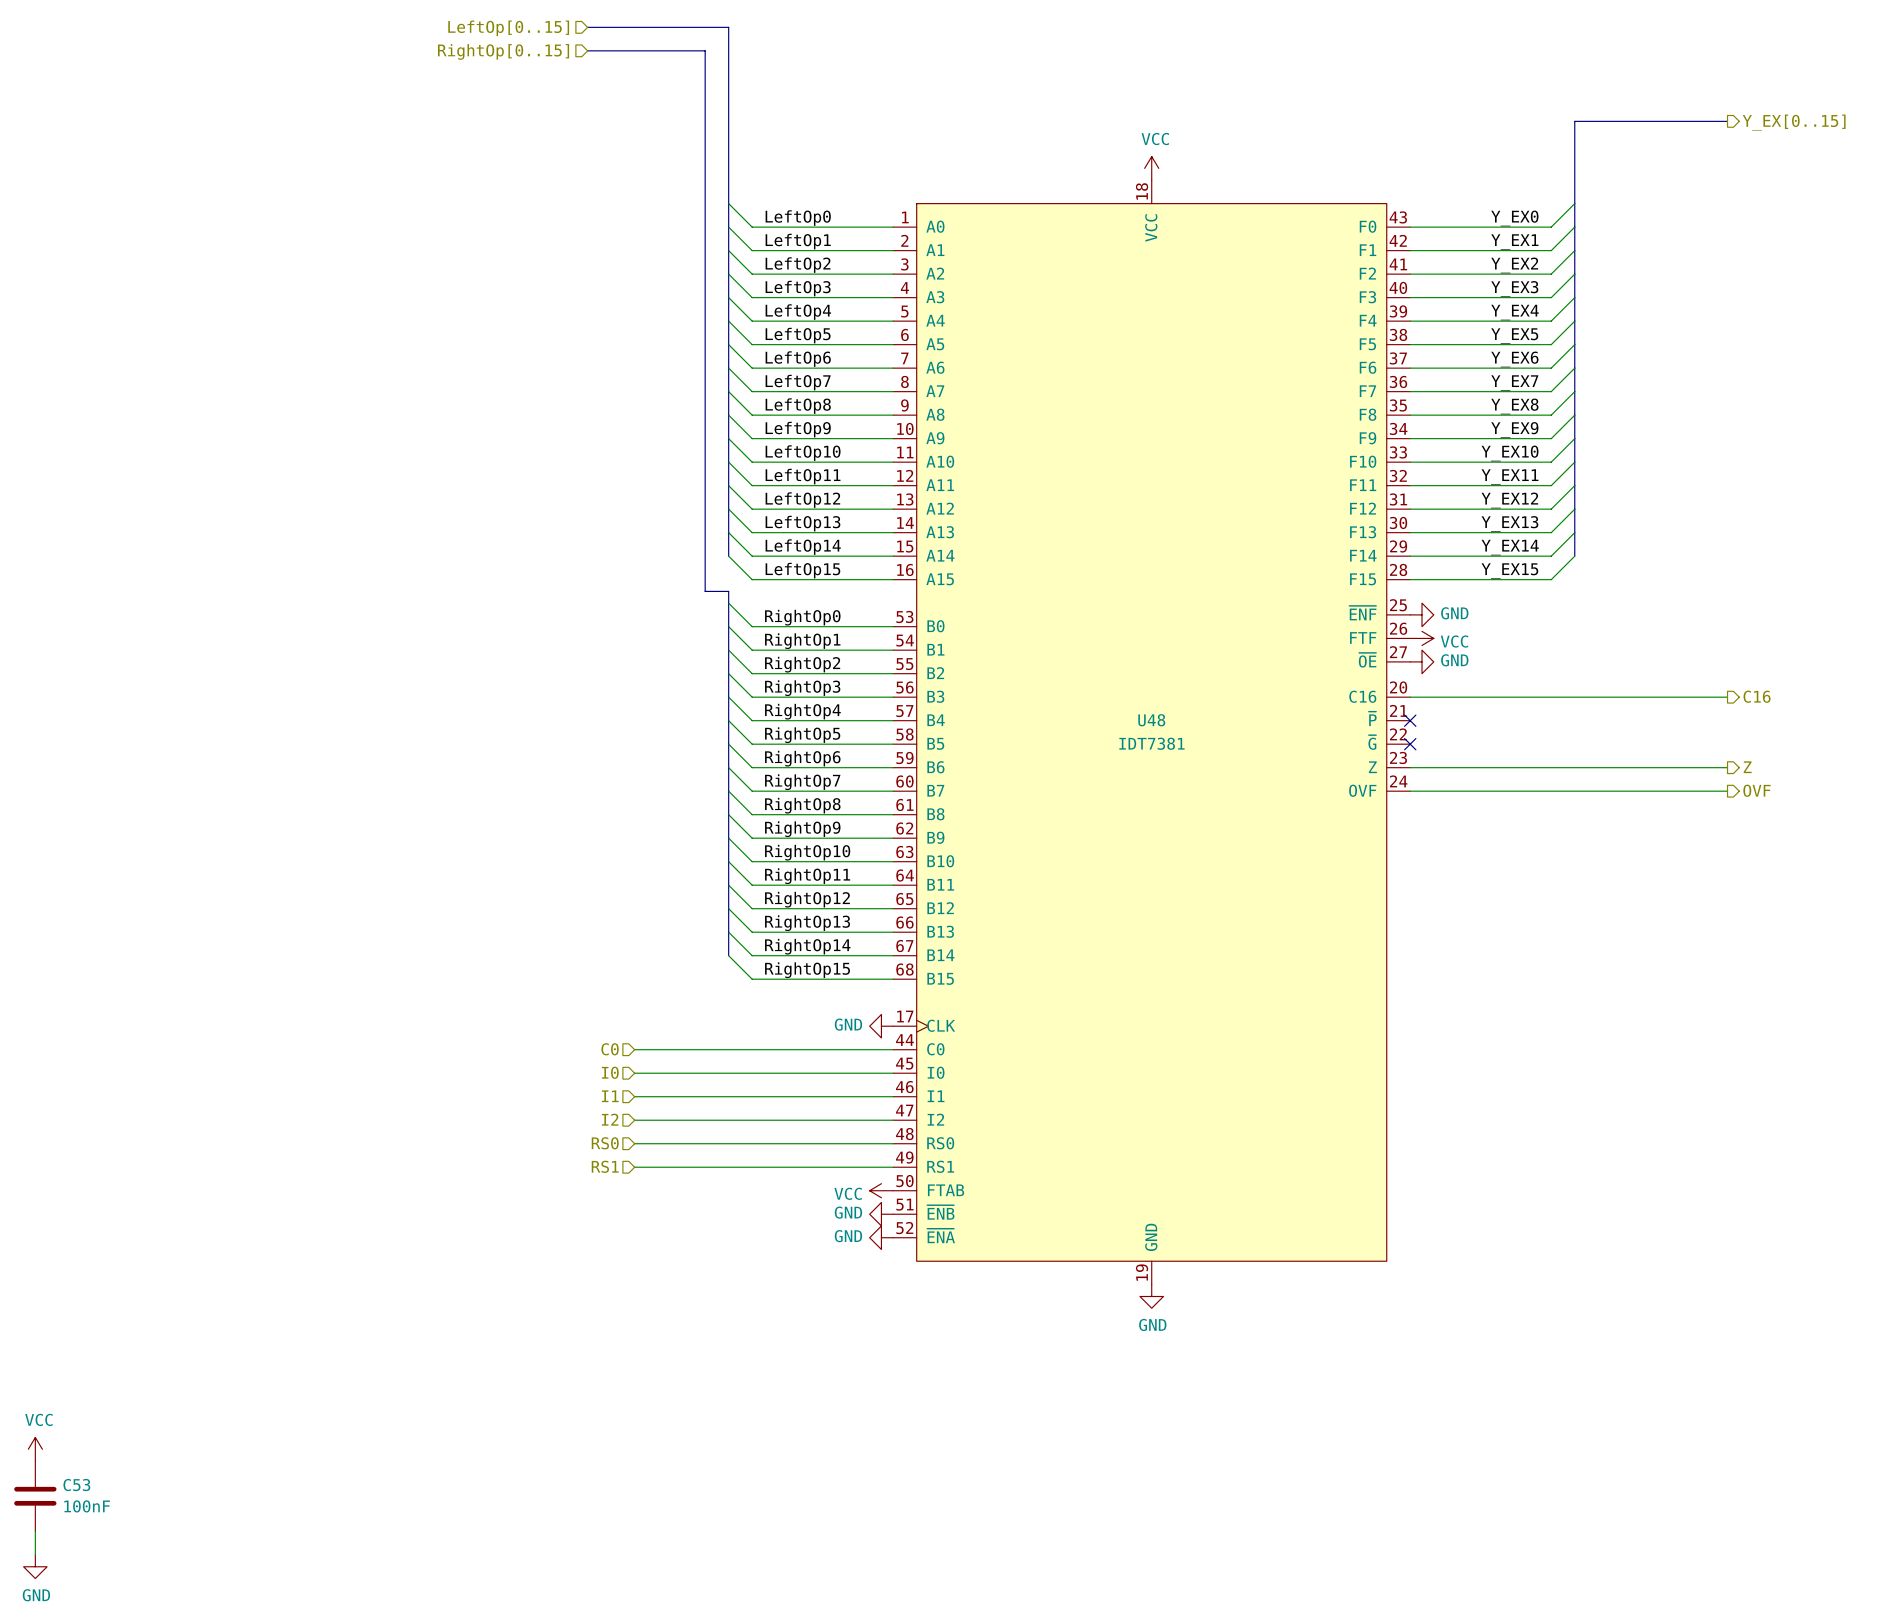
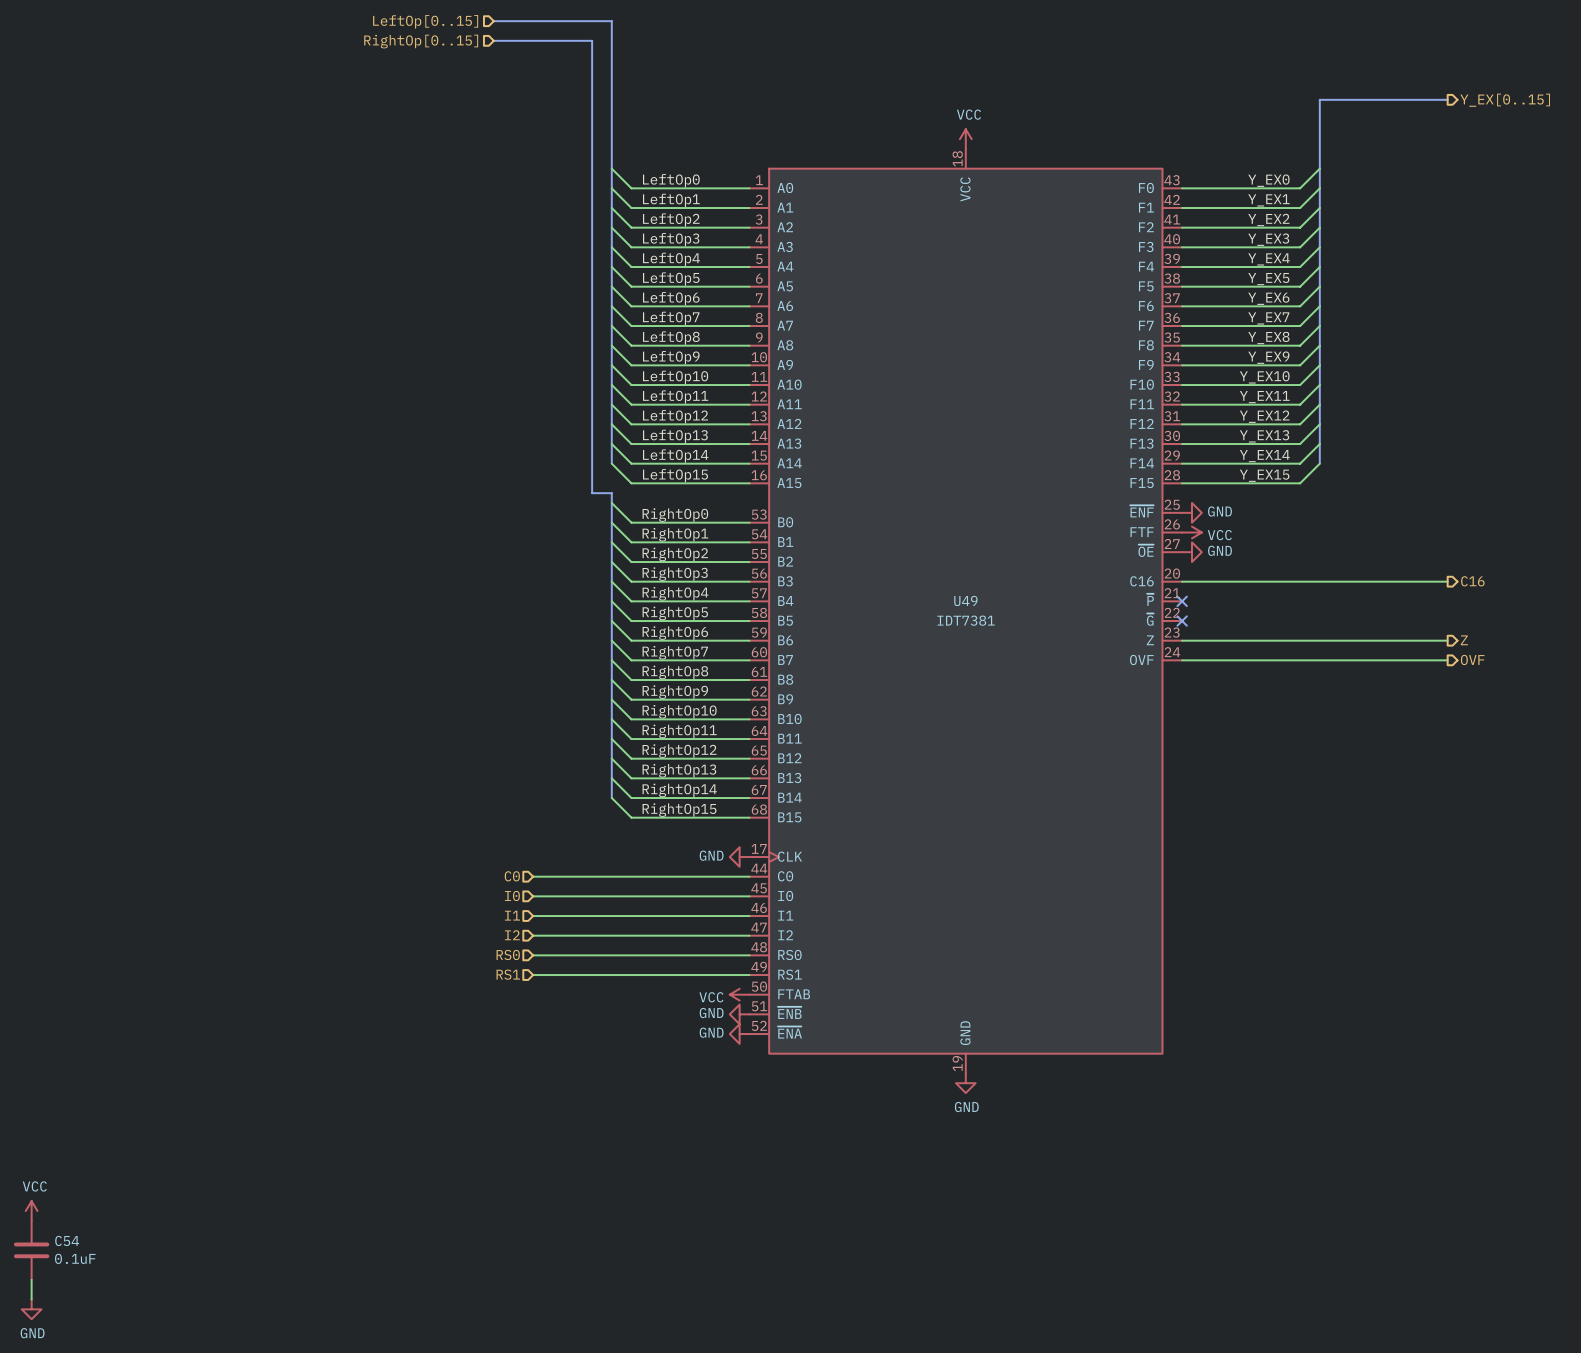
U48 name: U48 (1151, 720) -> U49 (965, 600)
C53 name: C53 (76, 1485) -> C54 (67, 1240)
C53 value: 100nF (87, 1506) -> 0.1uF (75, 1258)

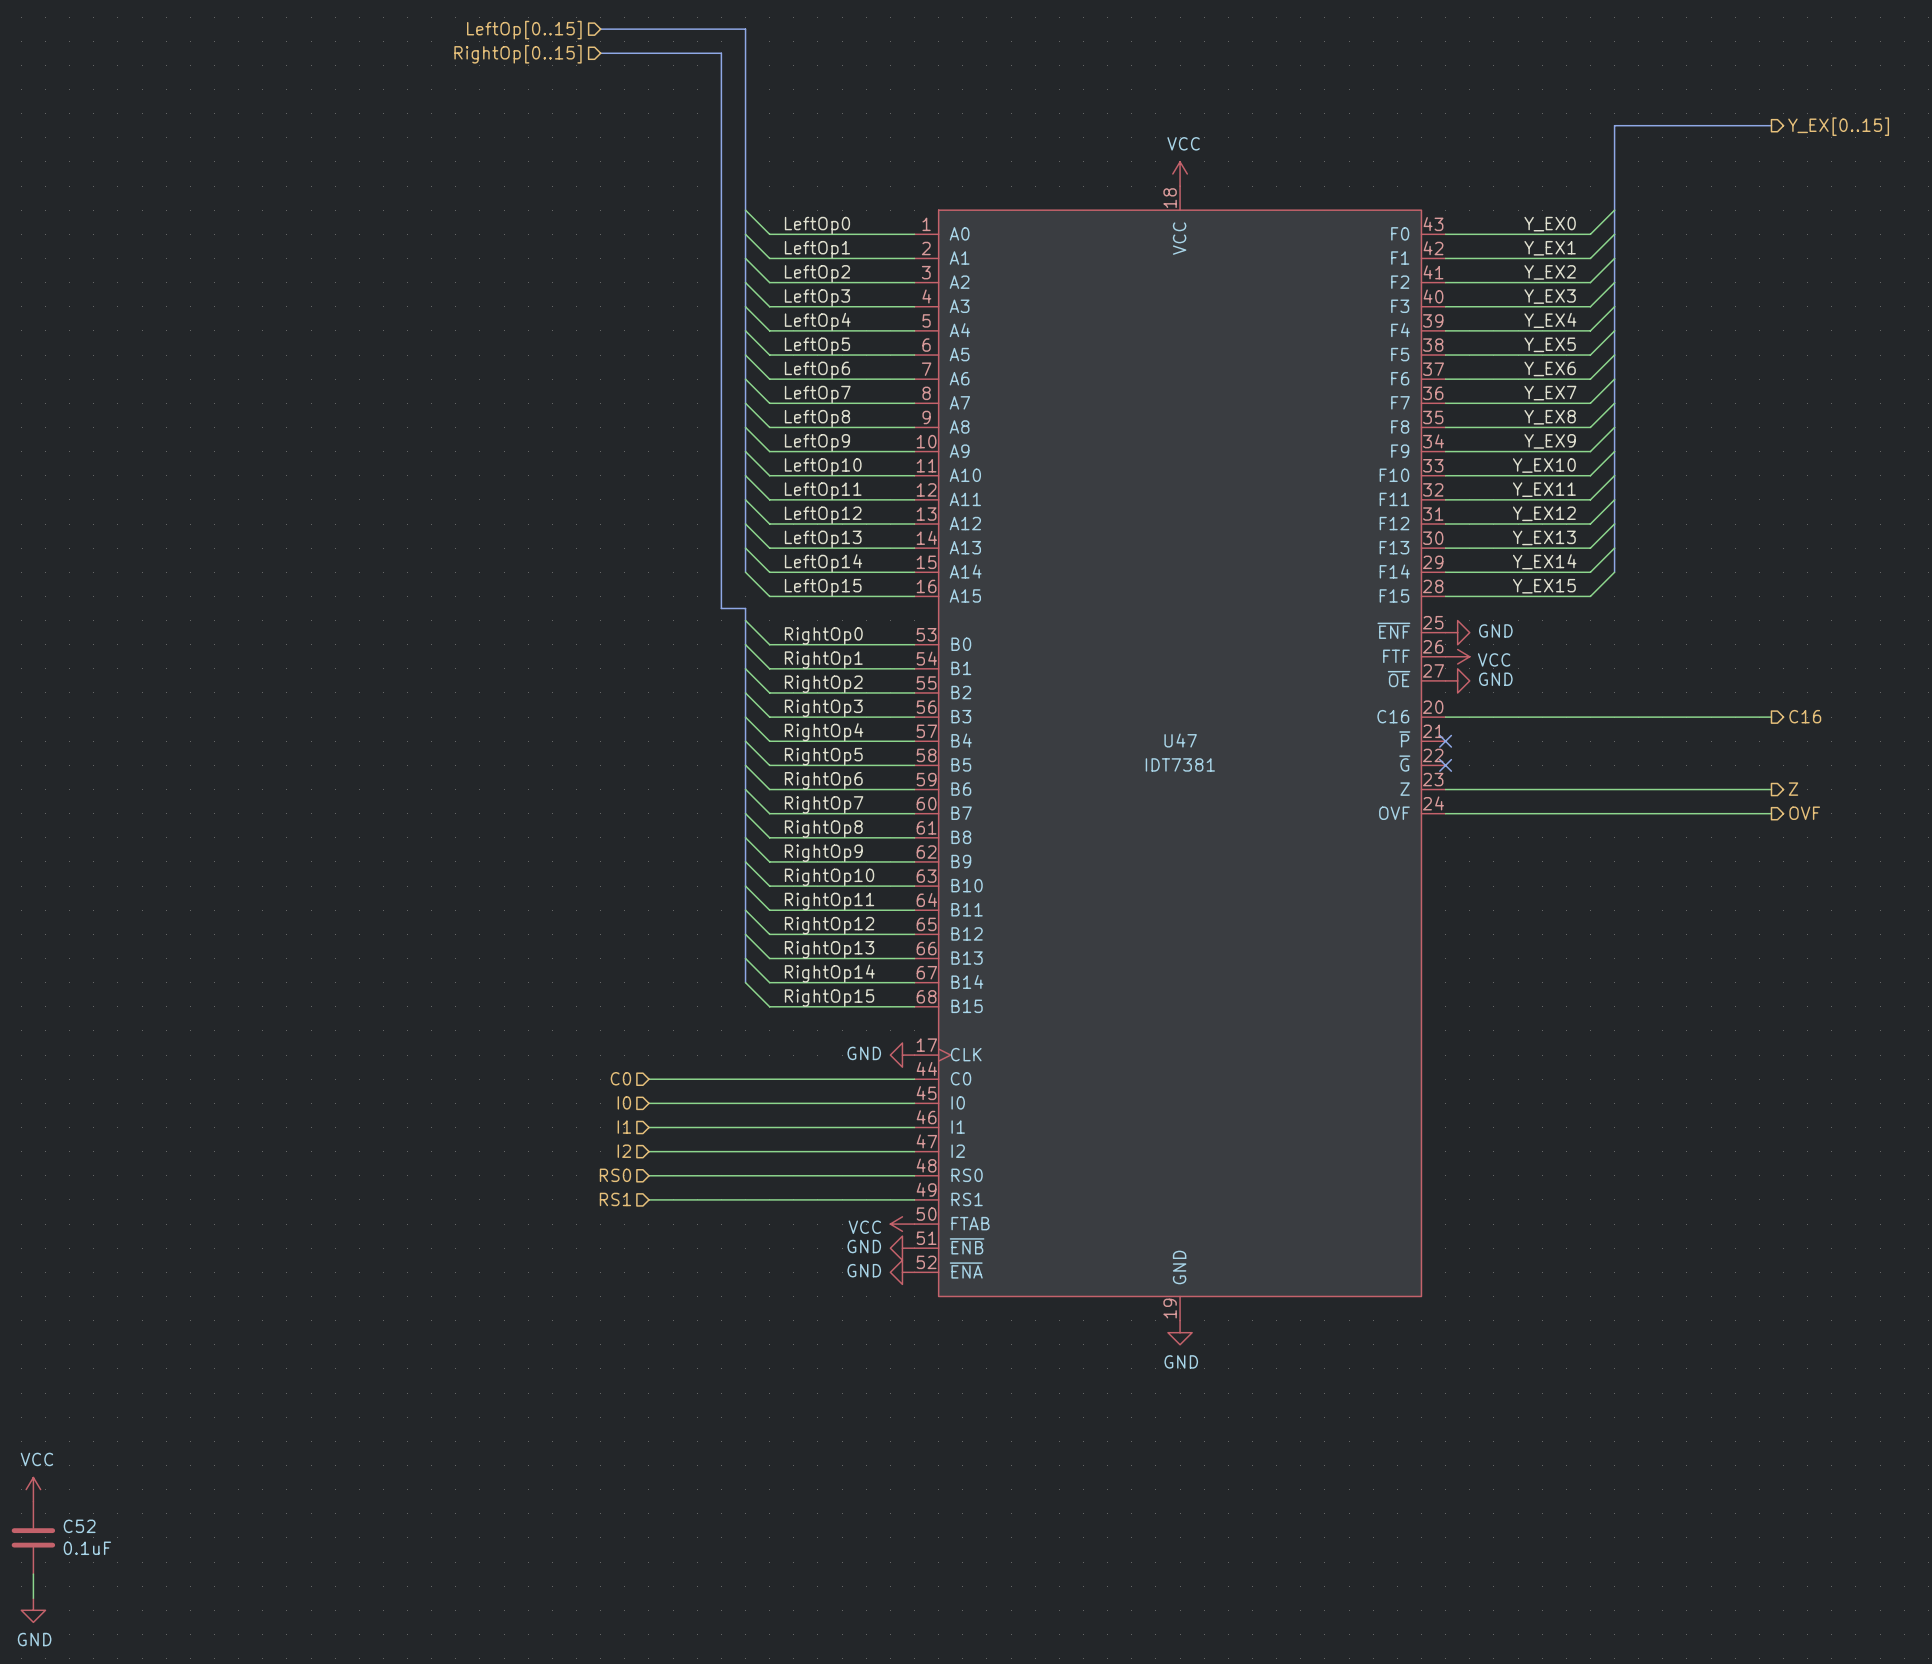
U49 name: U49 (965, 600) -> U47 (1180, 740)
C54 name: C54 (67, 1240) -> C52 (79, 1526)

